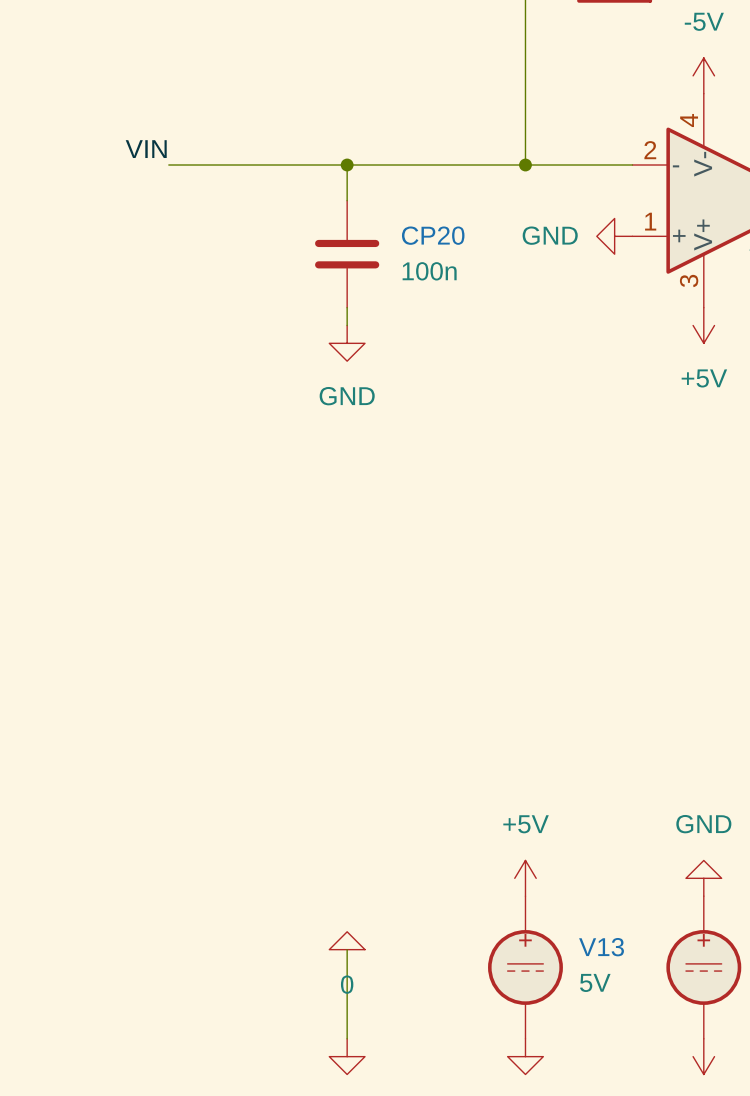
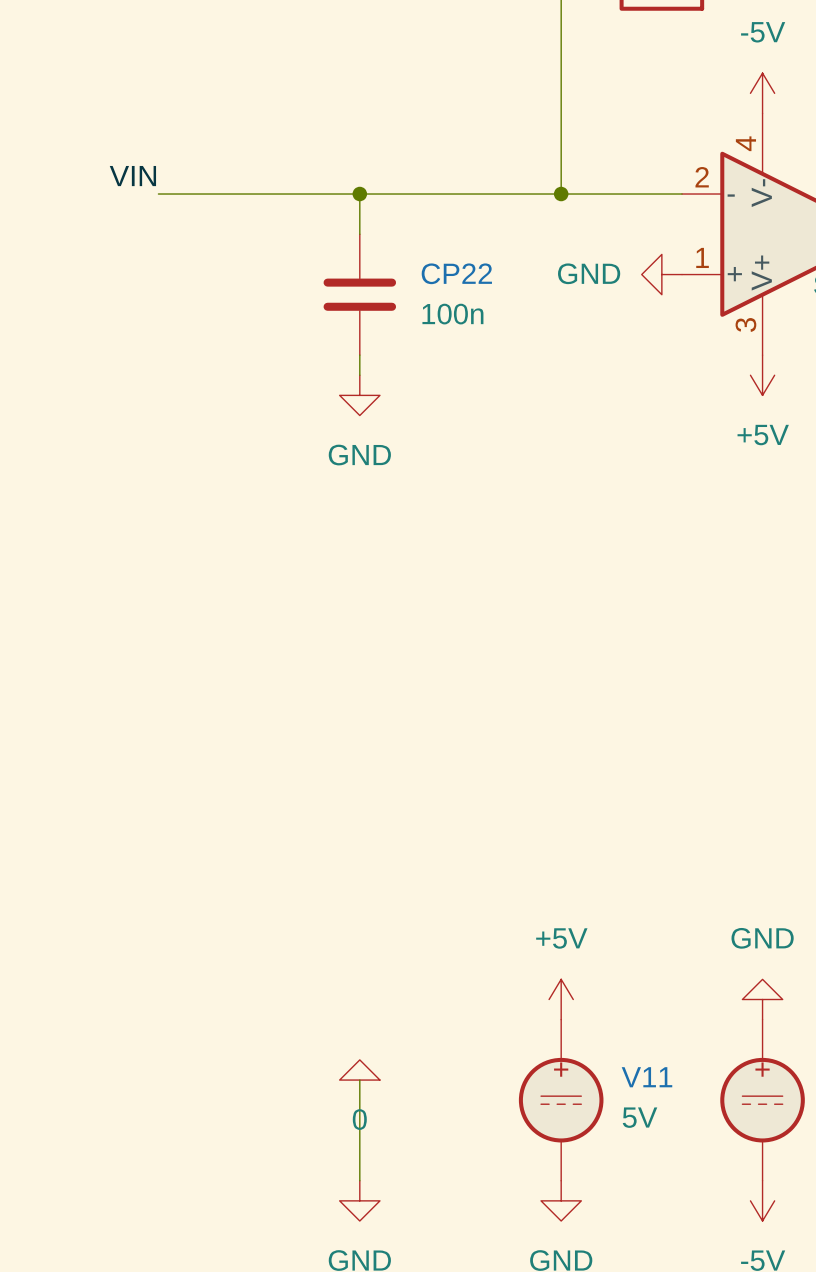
CP20 name: CP20 (433, 235) -> CP22 (456, 273)
V13 name: V13 (601, 947) -> V11 (646, 1077)

